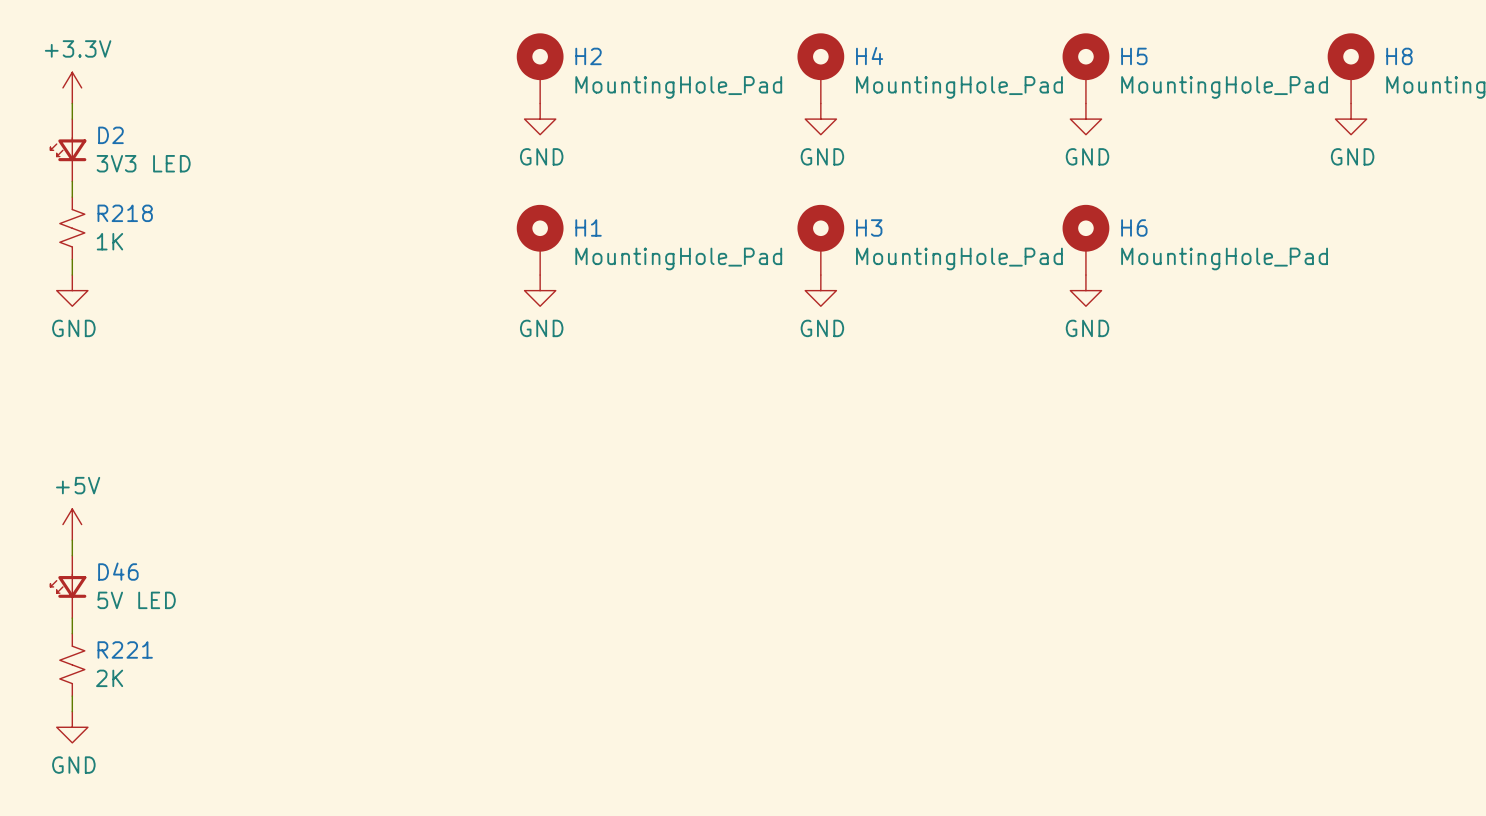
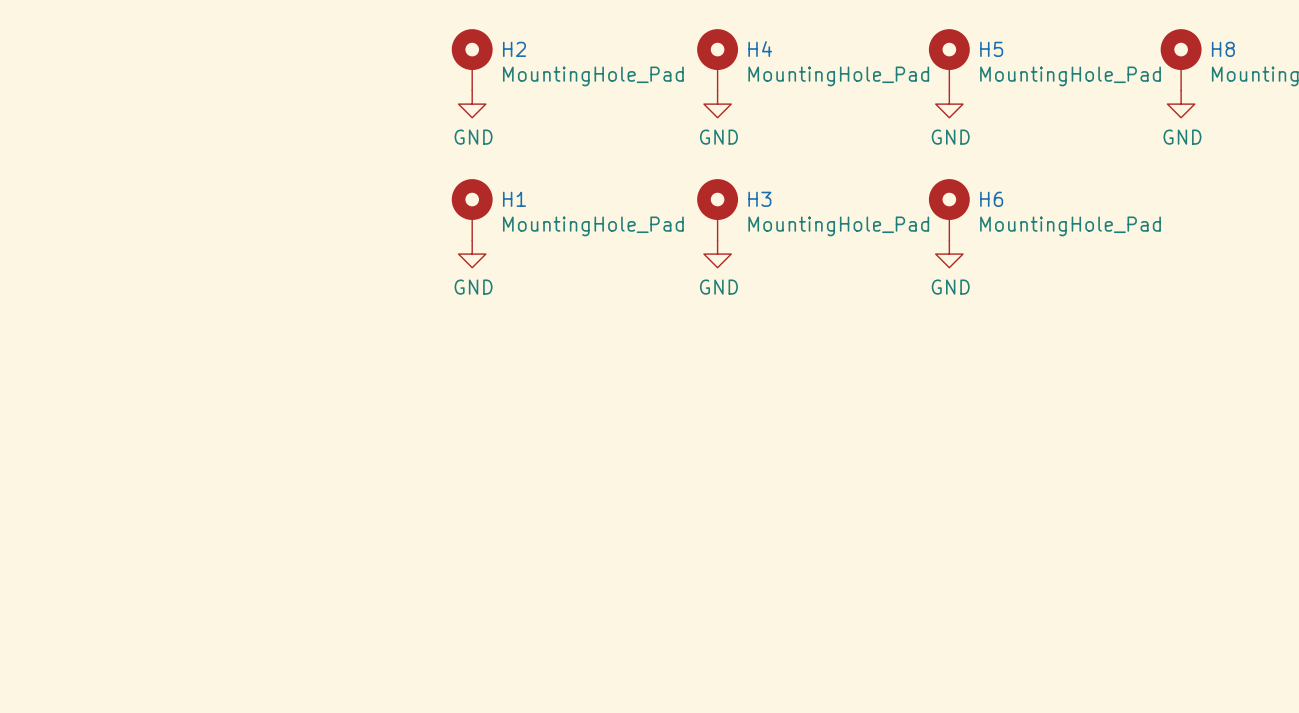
power symbol: +3.3V (72, 87) -> none
wire: (72, 103) (72, 119) -> none
D2: 3V3 LED (68, 150) -> none
wire: (72, 181) (72, 197) -> none
R218: 1K (72, 228) -> none
wire: (72, 259) (72, 275) -> none
power symbol: GND (72, 290) -> none
power symbol: +5V (72, 524) -> none
wire: (72, 540) (72, 555) -> none
D46: 5V LED (68, 586) -> none
wire: (72, 618) (72, 633) -> none
R221: 2K (72, 664) -> none
wire: (72, 696) (72, 711) -> none
power symbol: GND (72, 727) -> none

